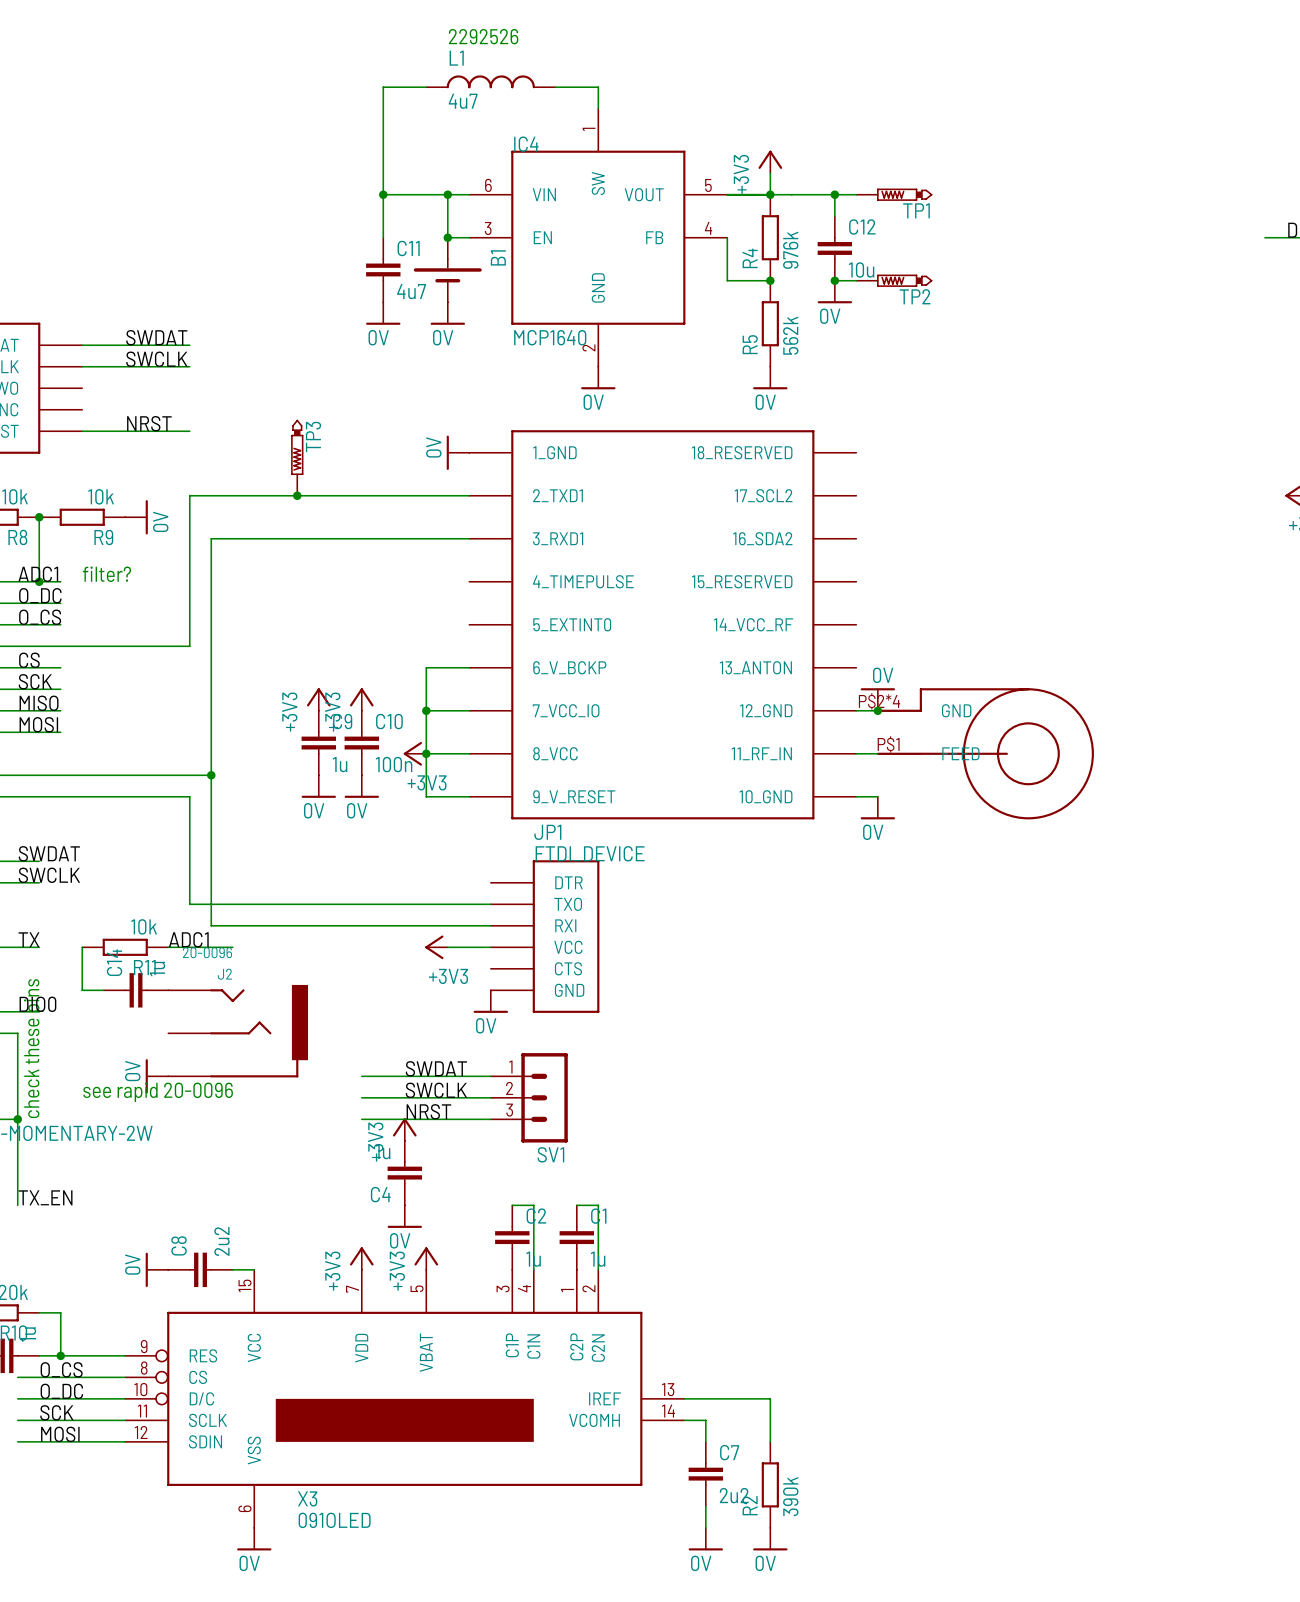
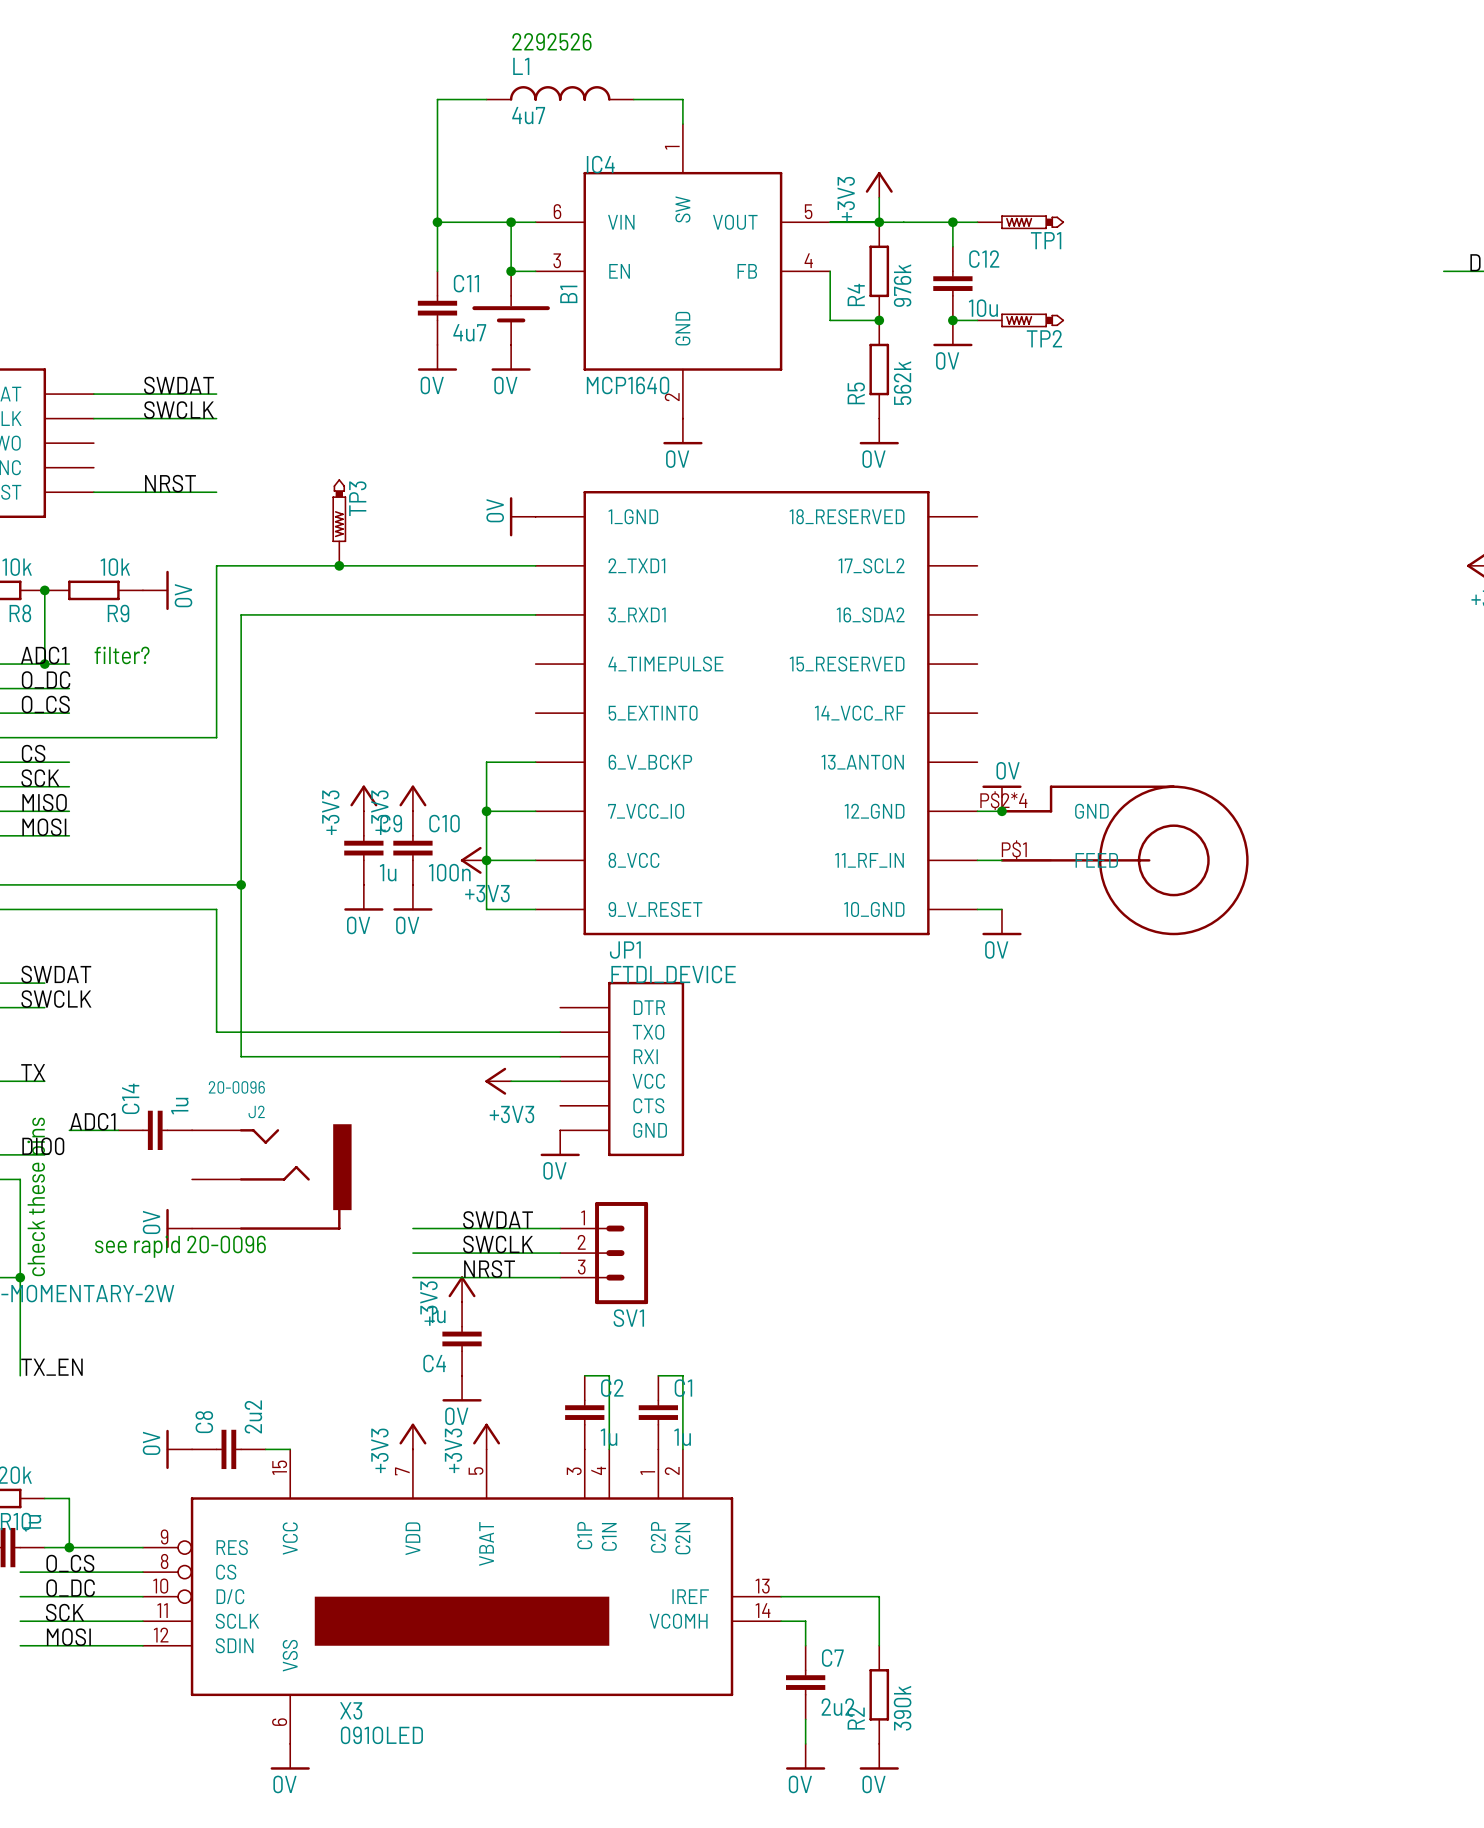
label position: ADC1 (188, 939) -> ADC1 (92, 1121)
wire: (82, 947) (82, 990) -> (69, 1130) (93, 1130)
R11: 10k (125, 947) -> none
wire: (168, 947) (232, 947) -> none

